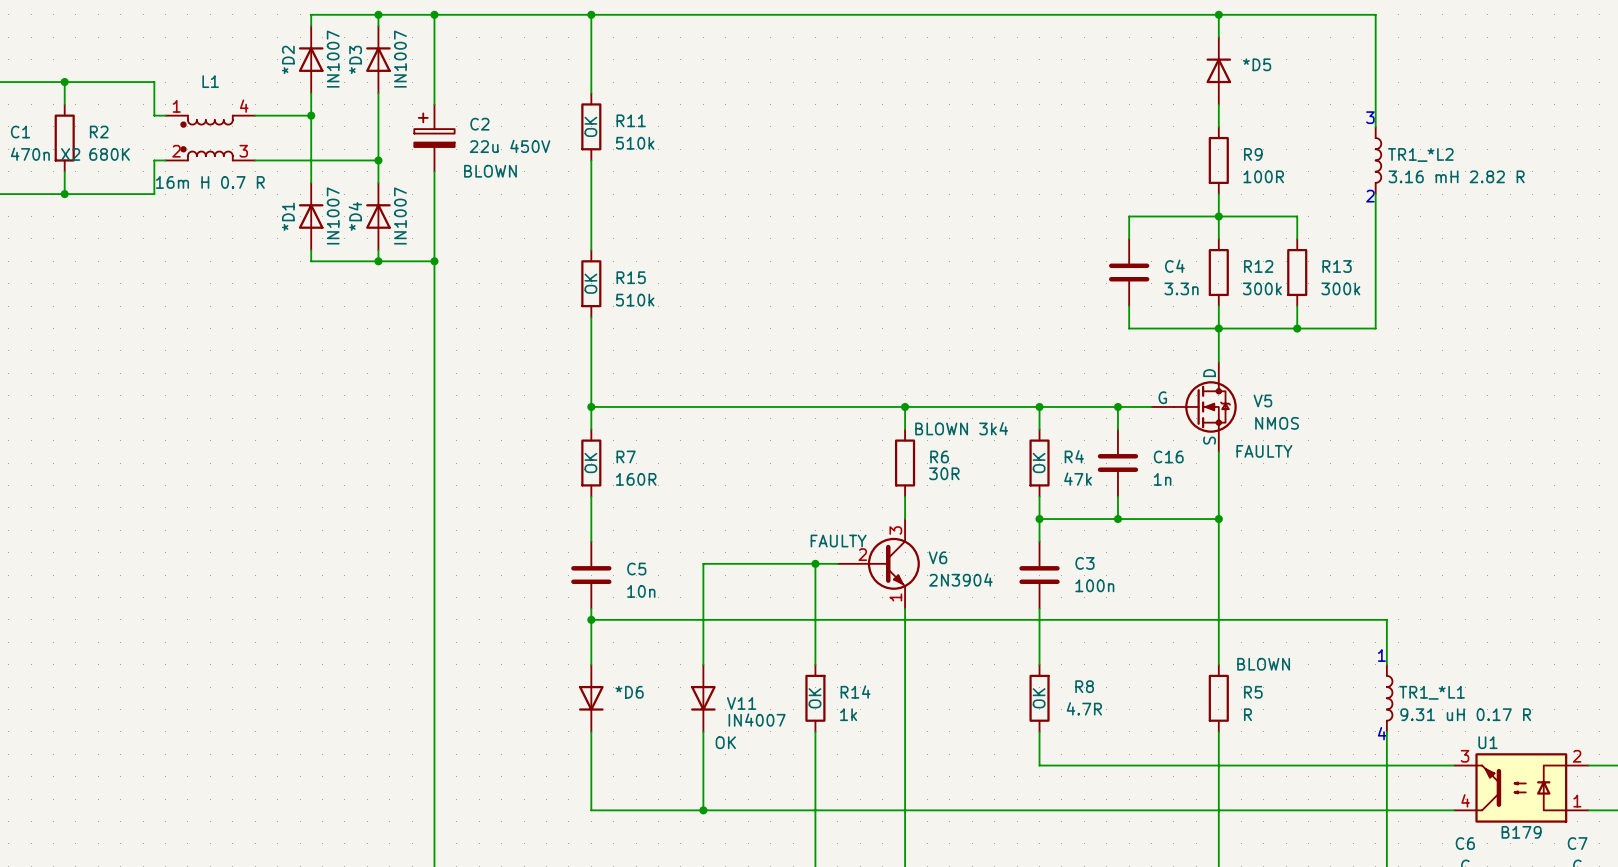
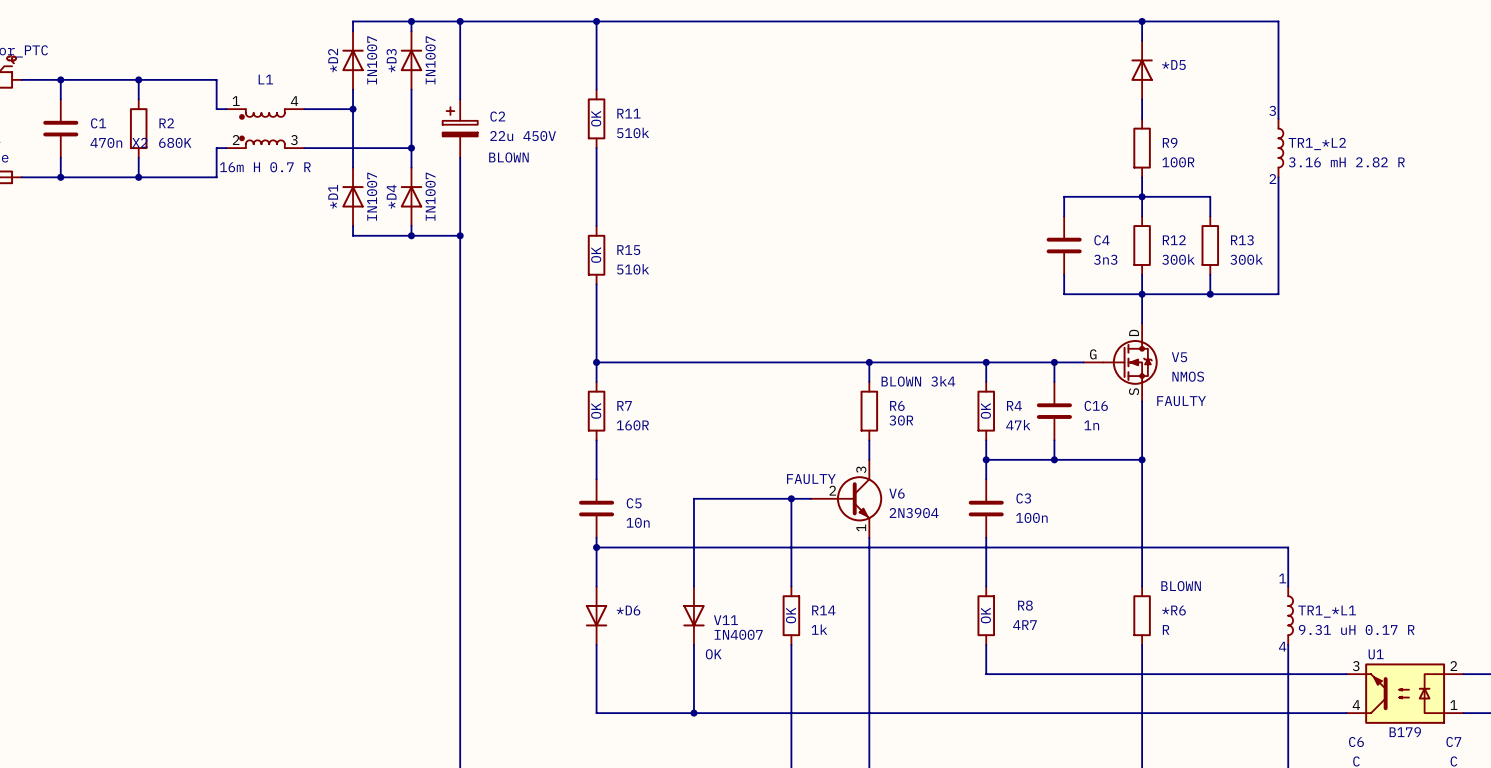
C4 value: 3.3n (1181, 288) -> 3n3 (1105, 259)
R5 name: R5 (1253, 692) -> *R6 (1173, 610)
R8 value: 4.7R (1084, 708) -> 4R7 (1024, 625)

